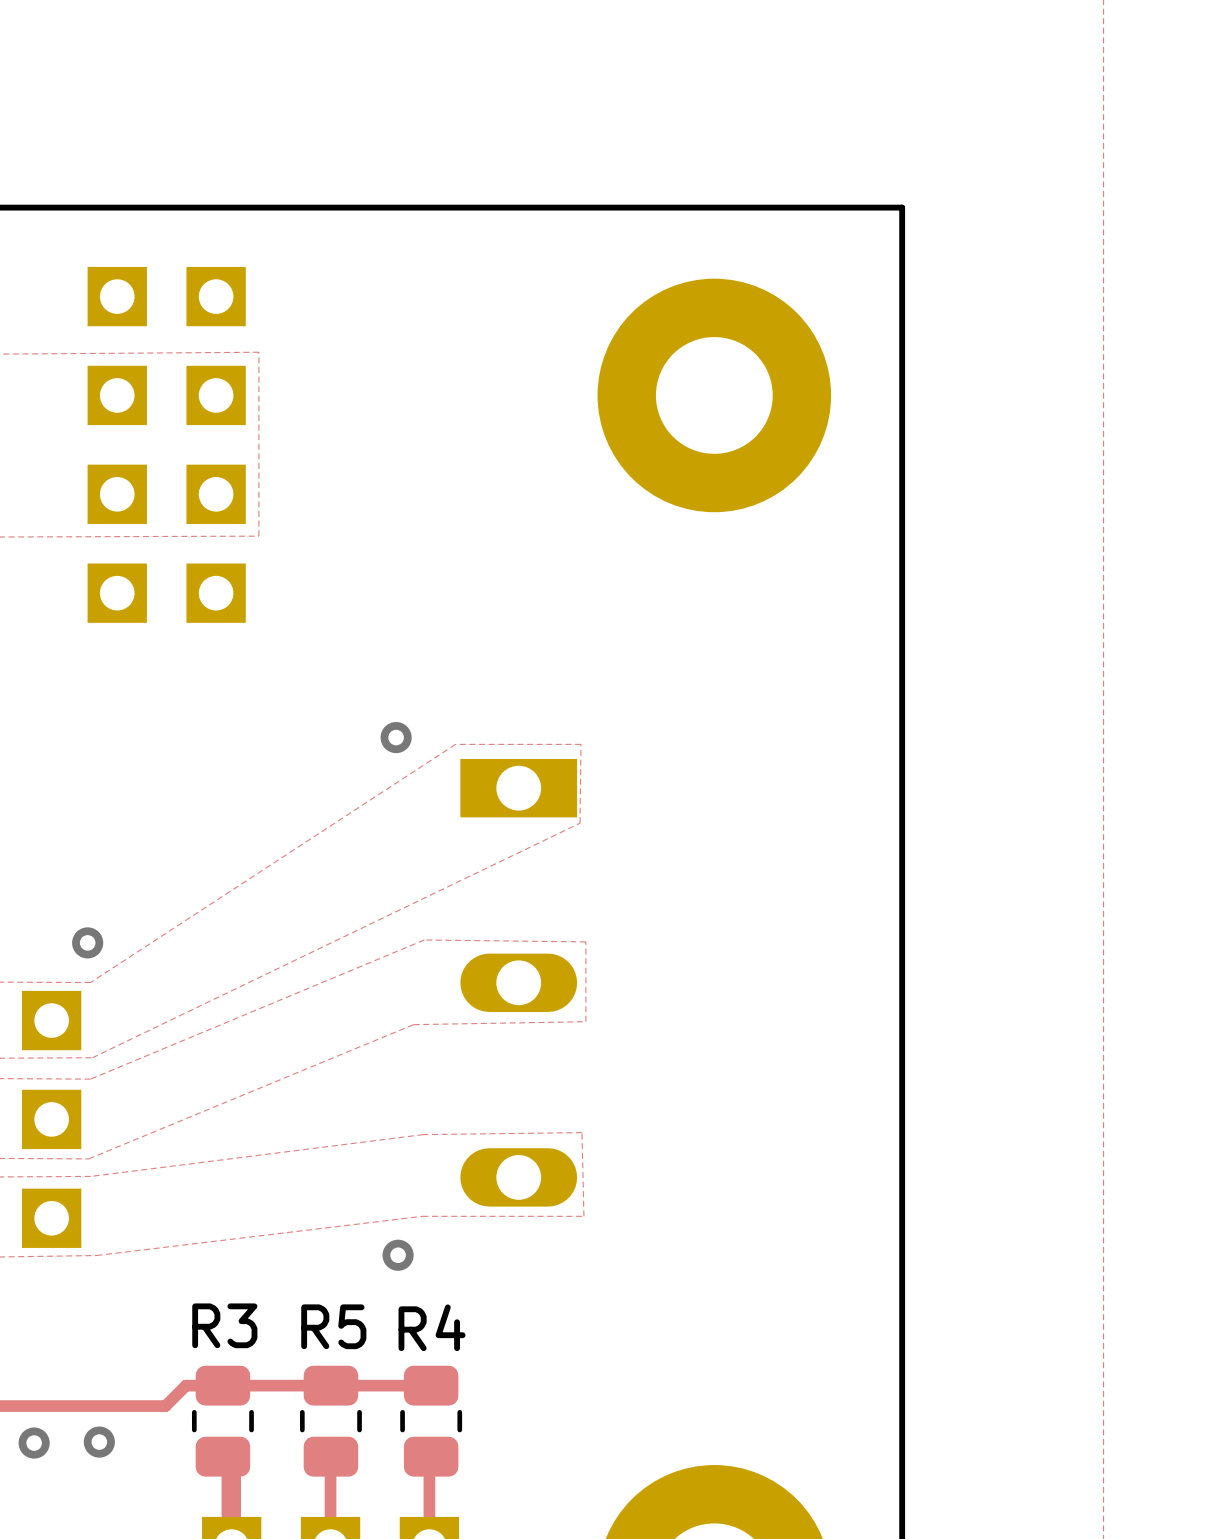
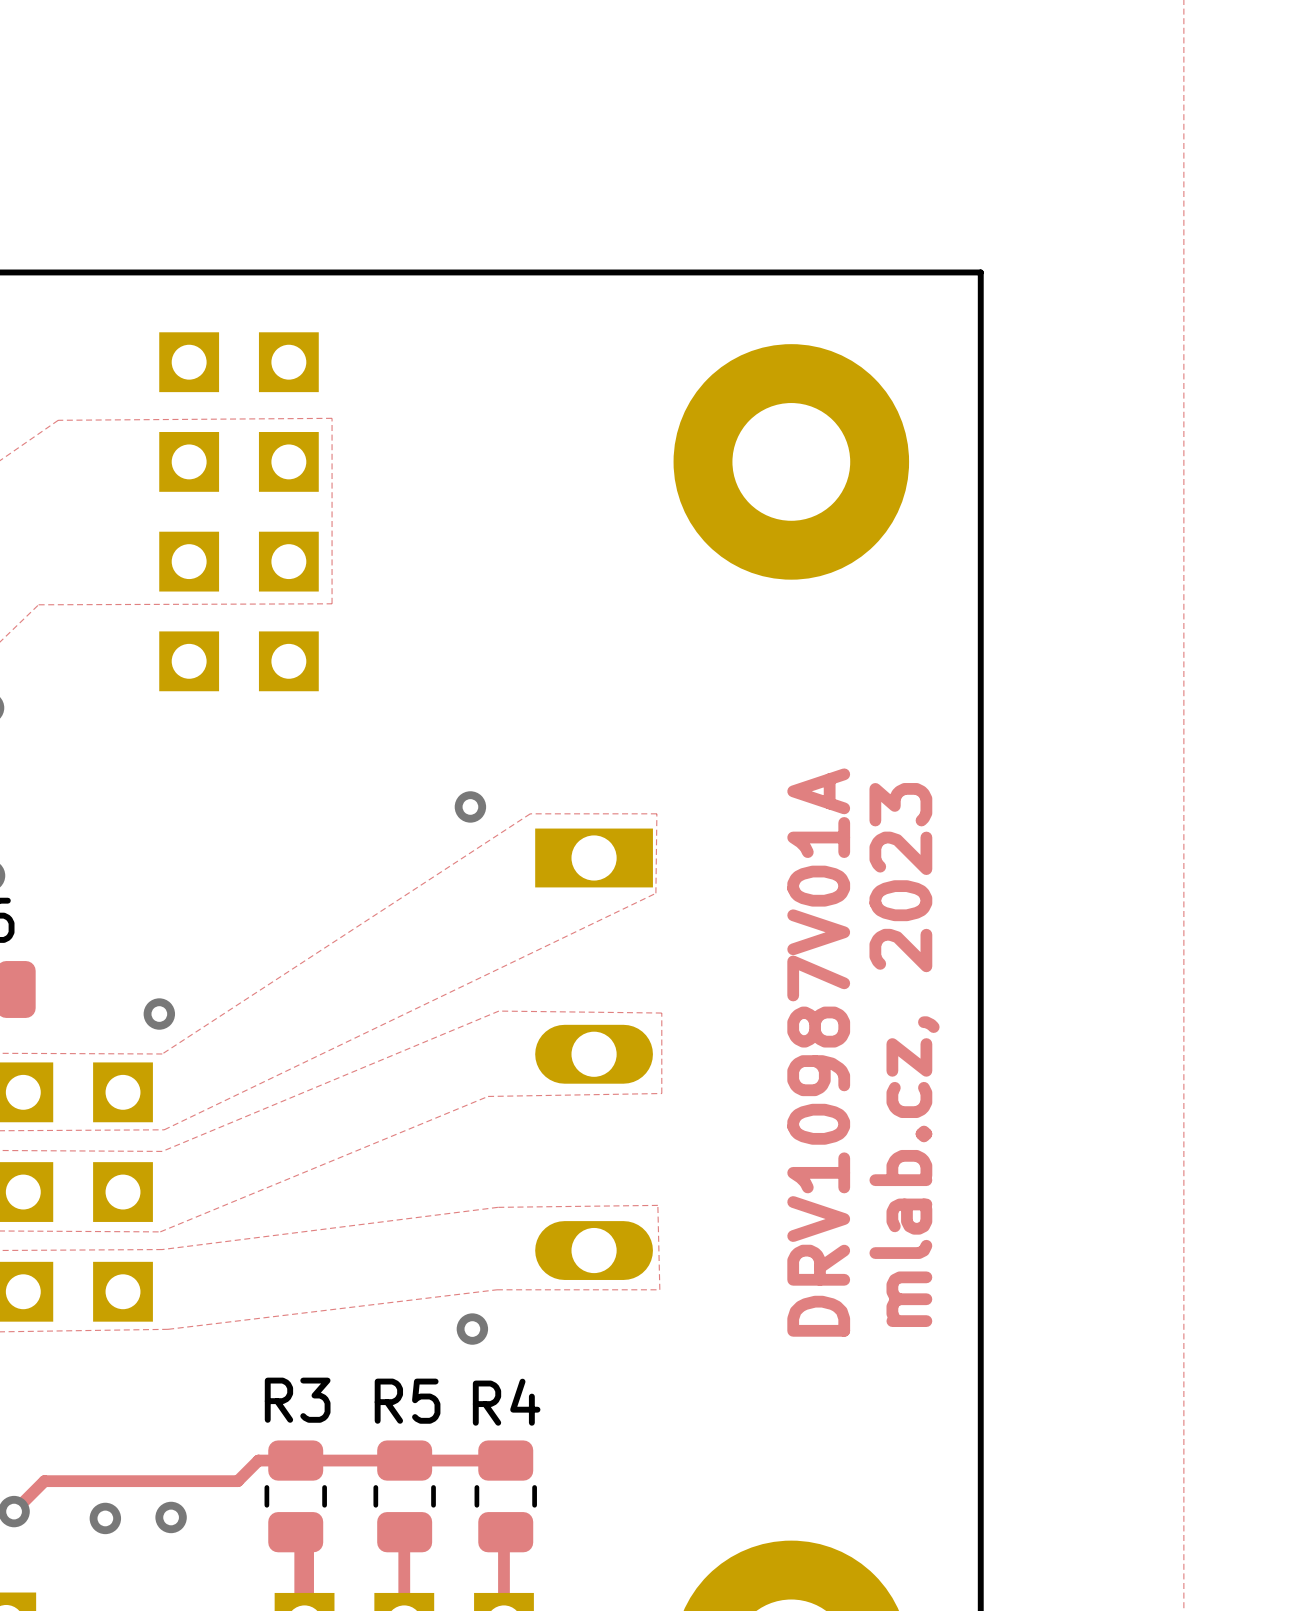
text: none -> DRV10987V01A (818, 1052)
text: none -> mlab.cz, 2023 (904, 1055)

